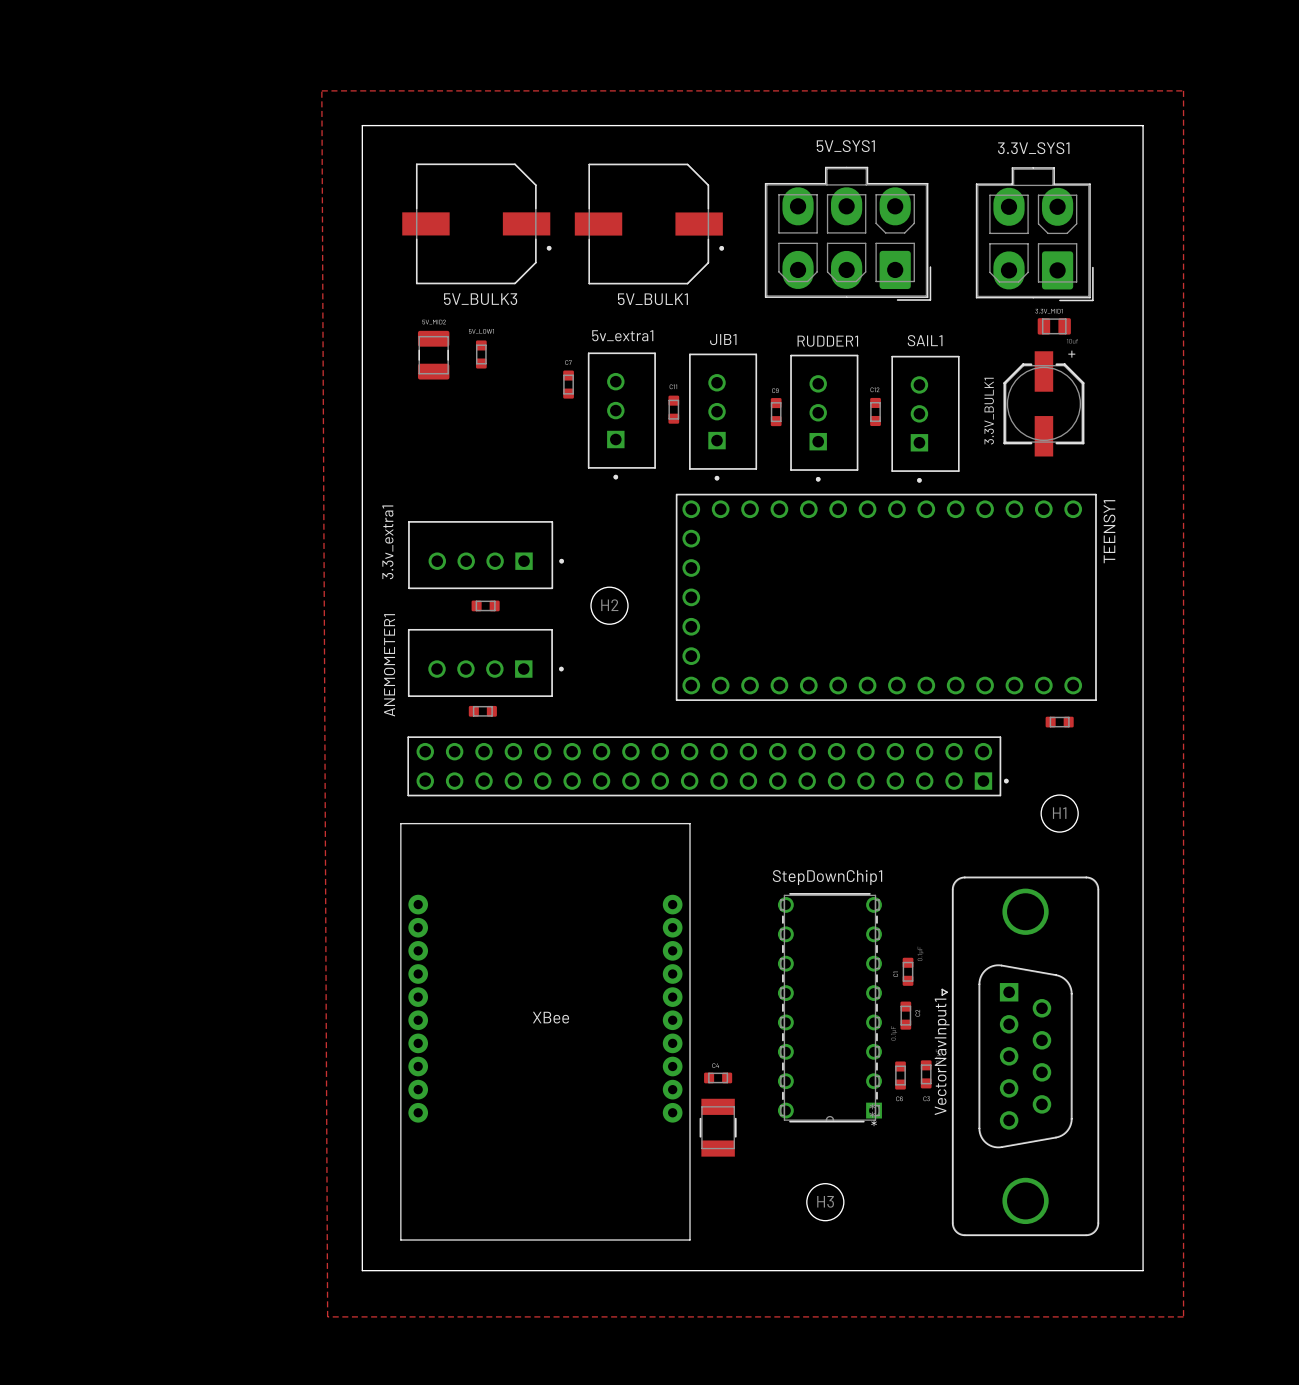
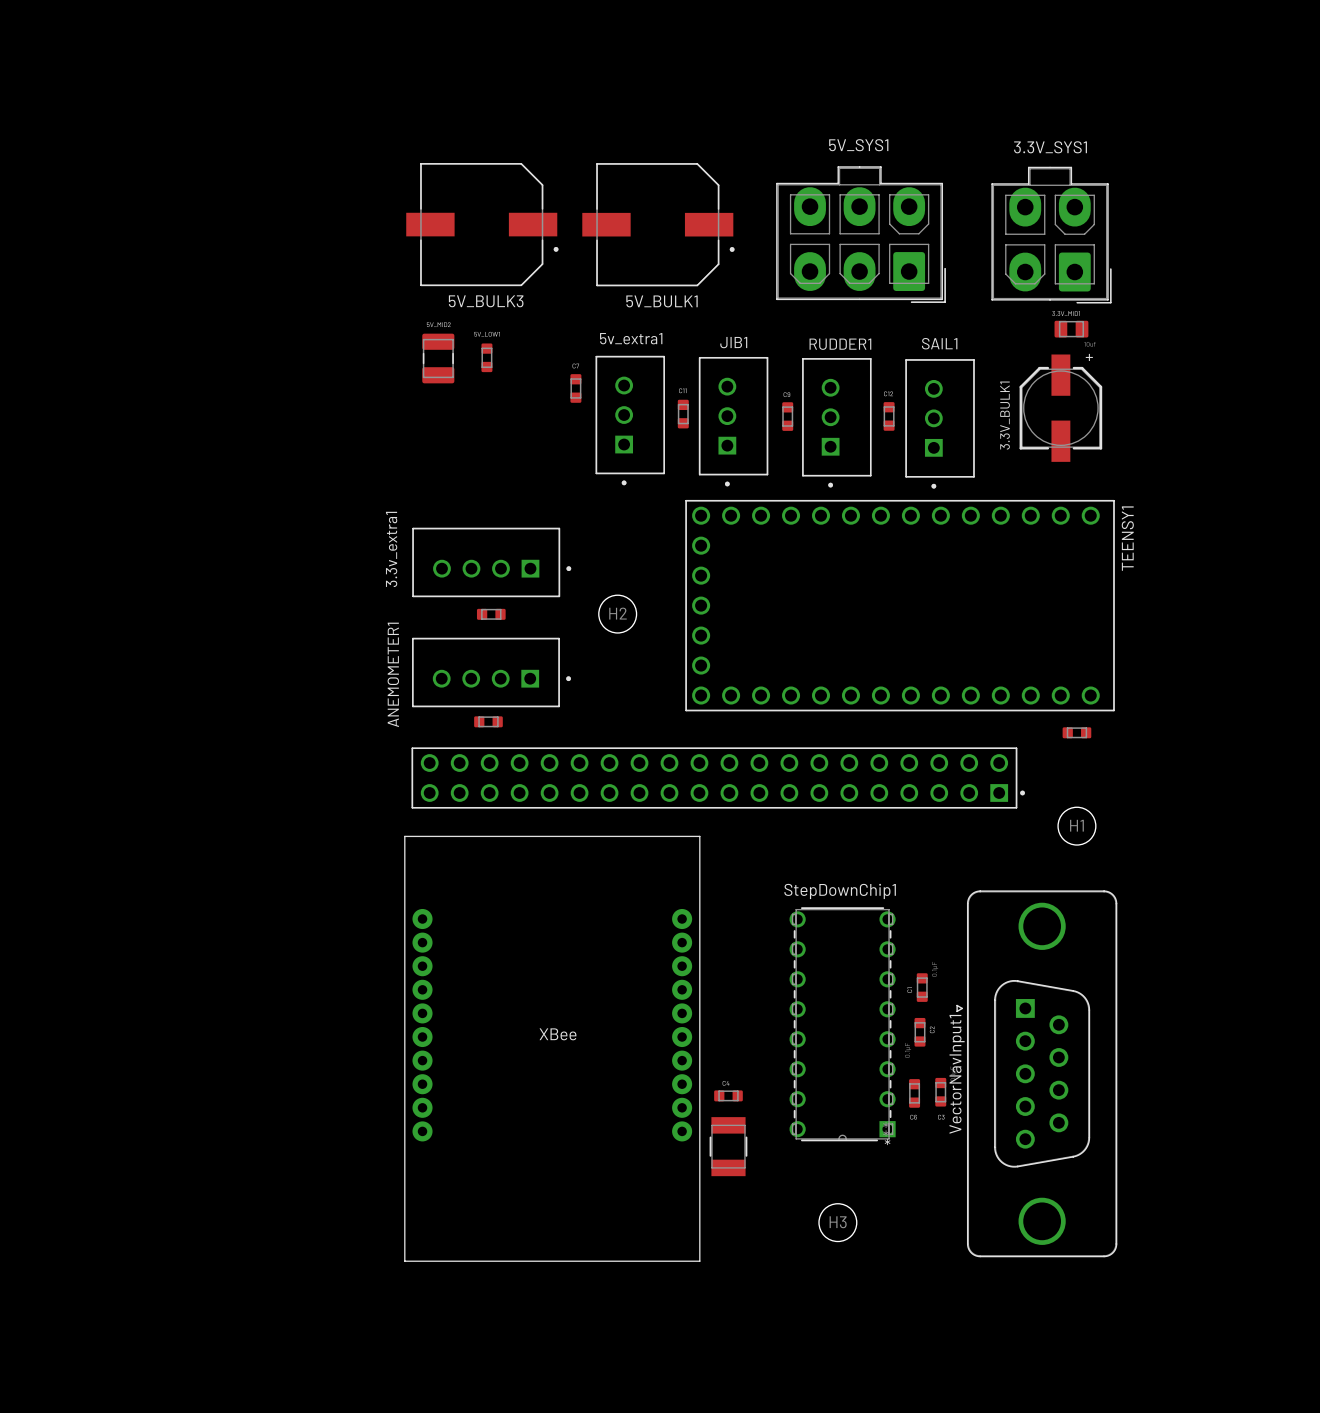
top zone outline: (321, 90) (1183, 90) (1183, 1316) (327, 1316) (321, 90) -> none
board edge: (362, 125) (1143, 125) (1143, 1270) (362, 1270) (362, 125) -> none

